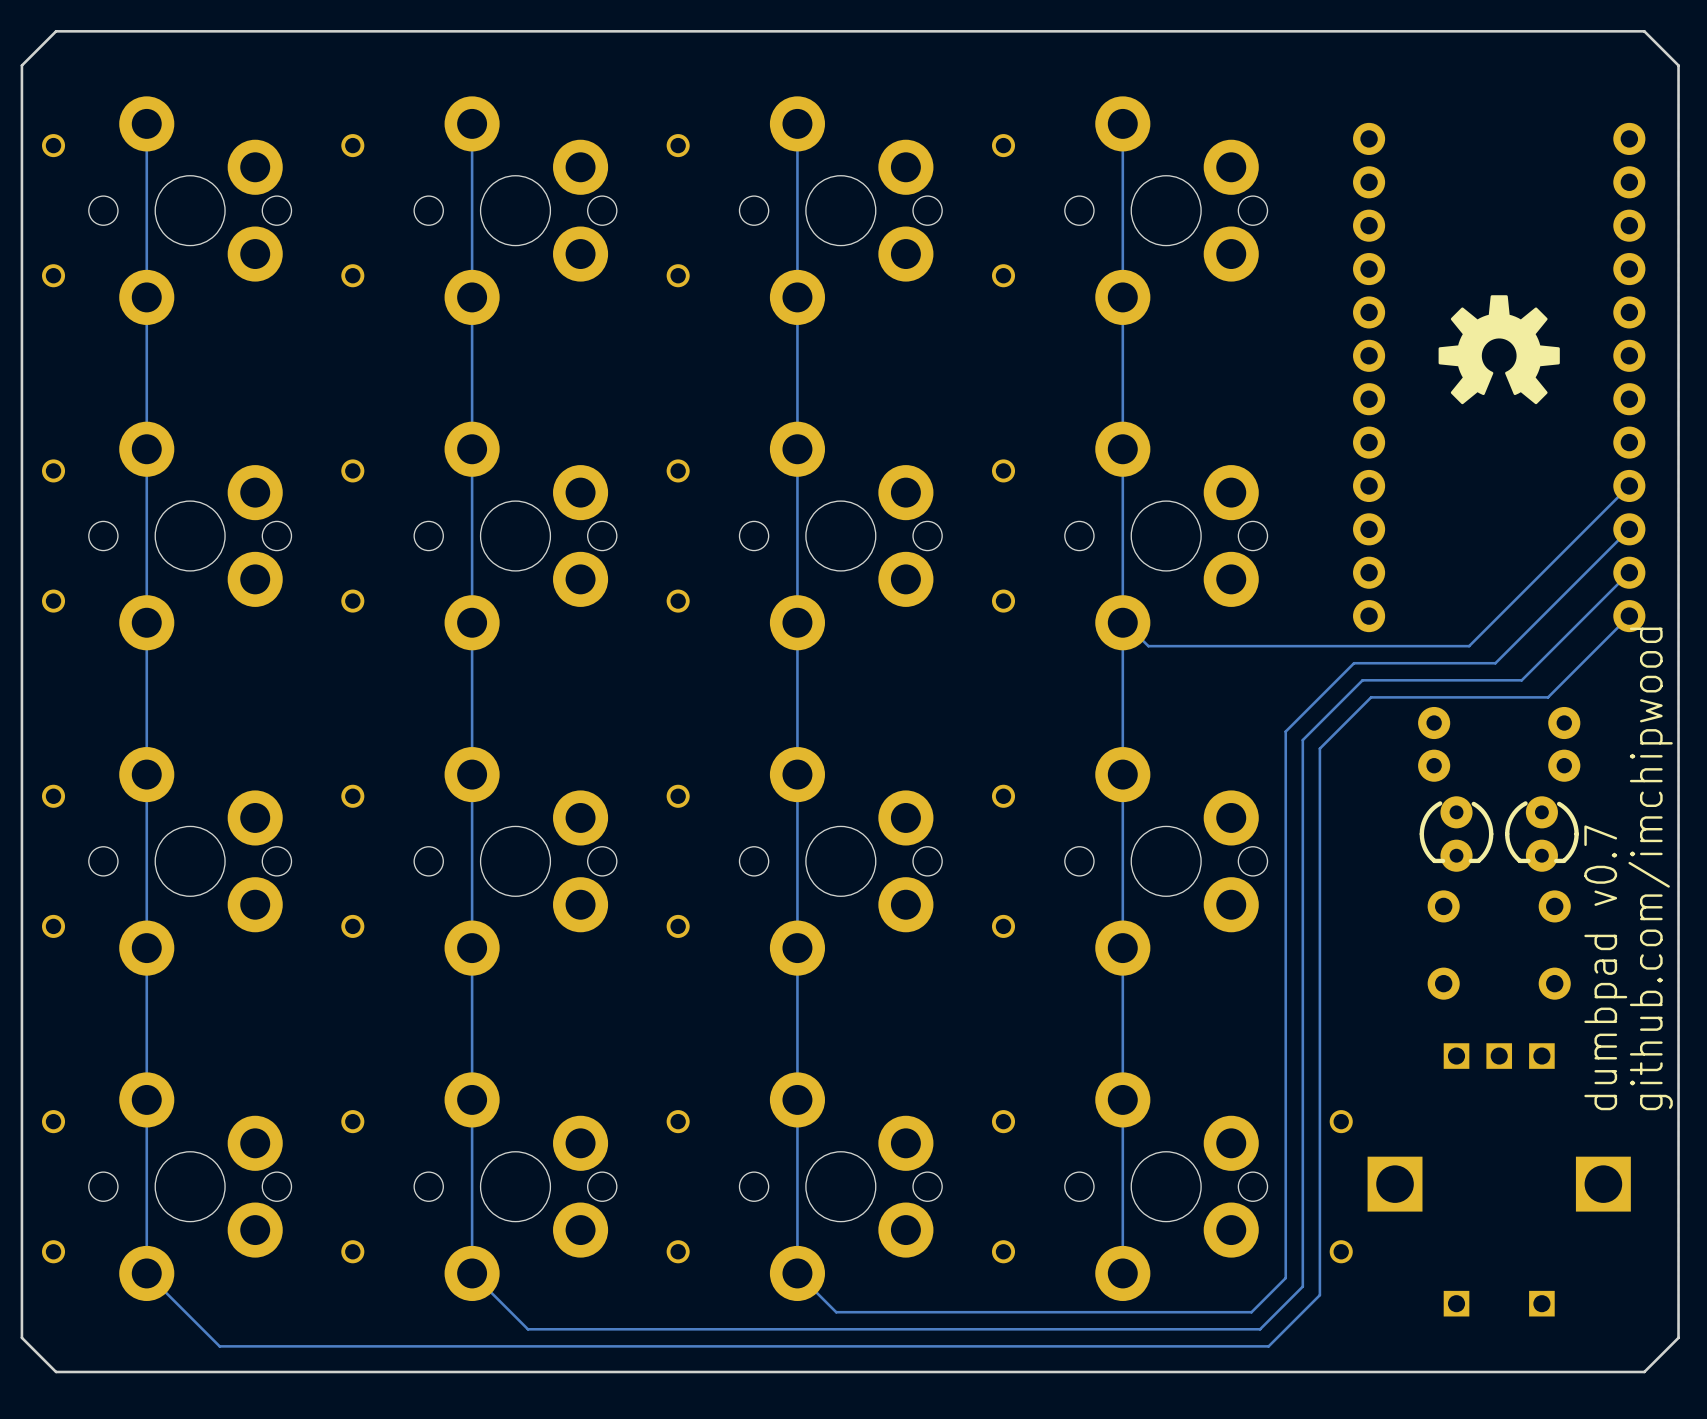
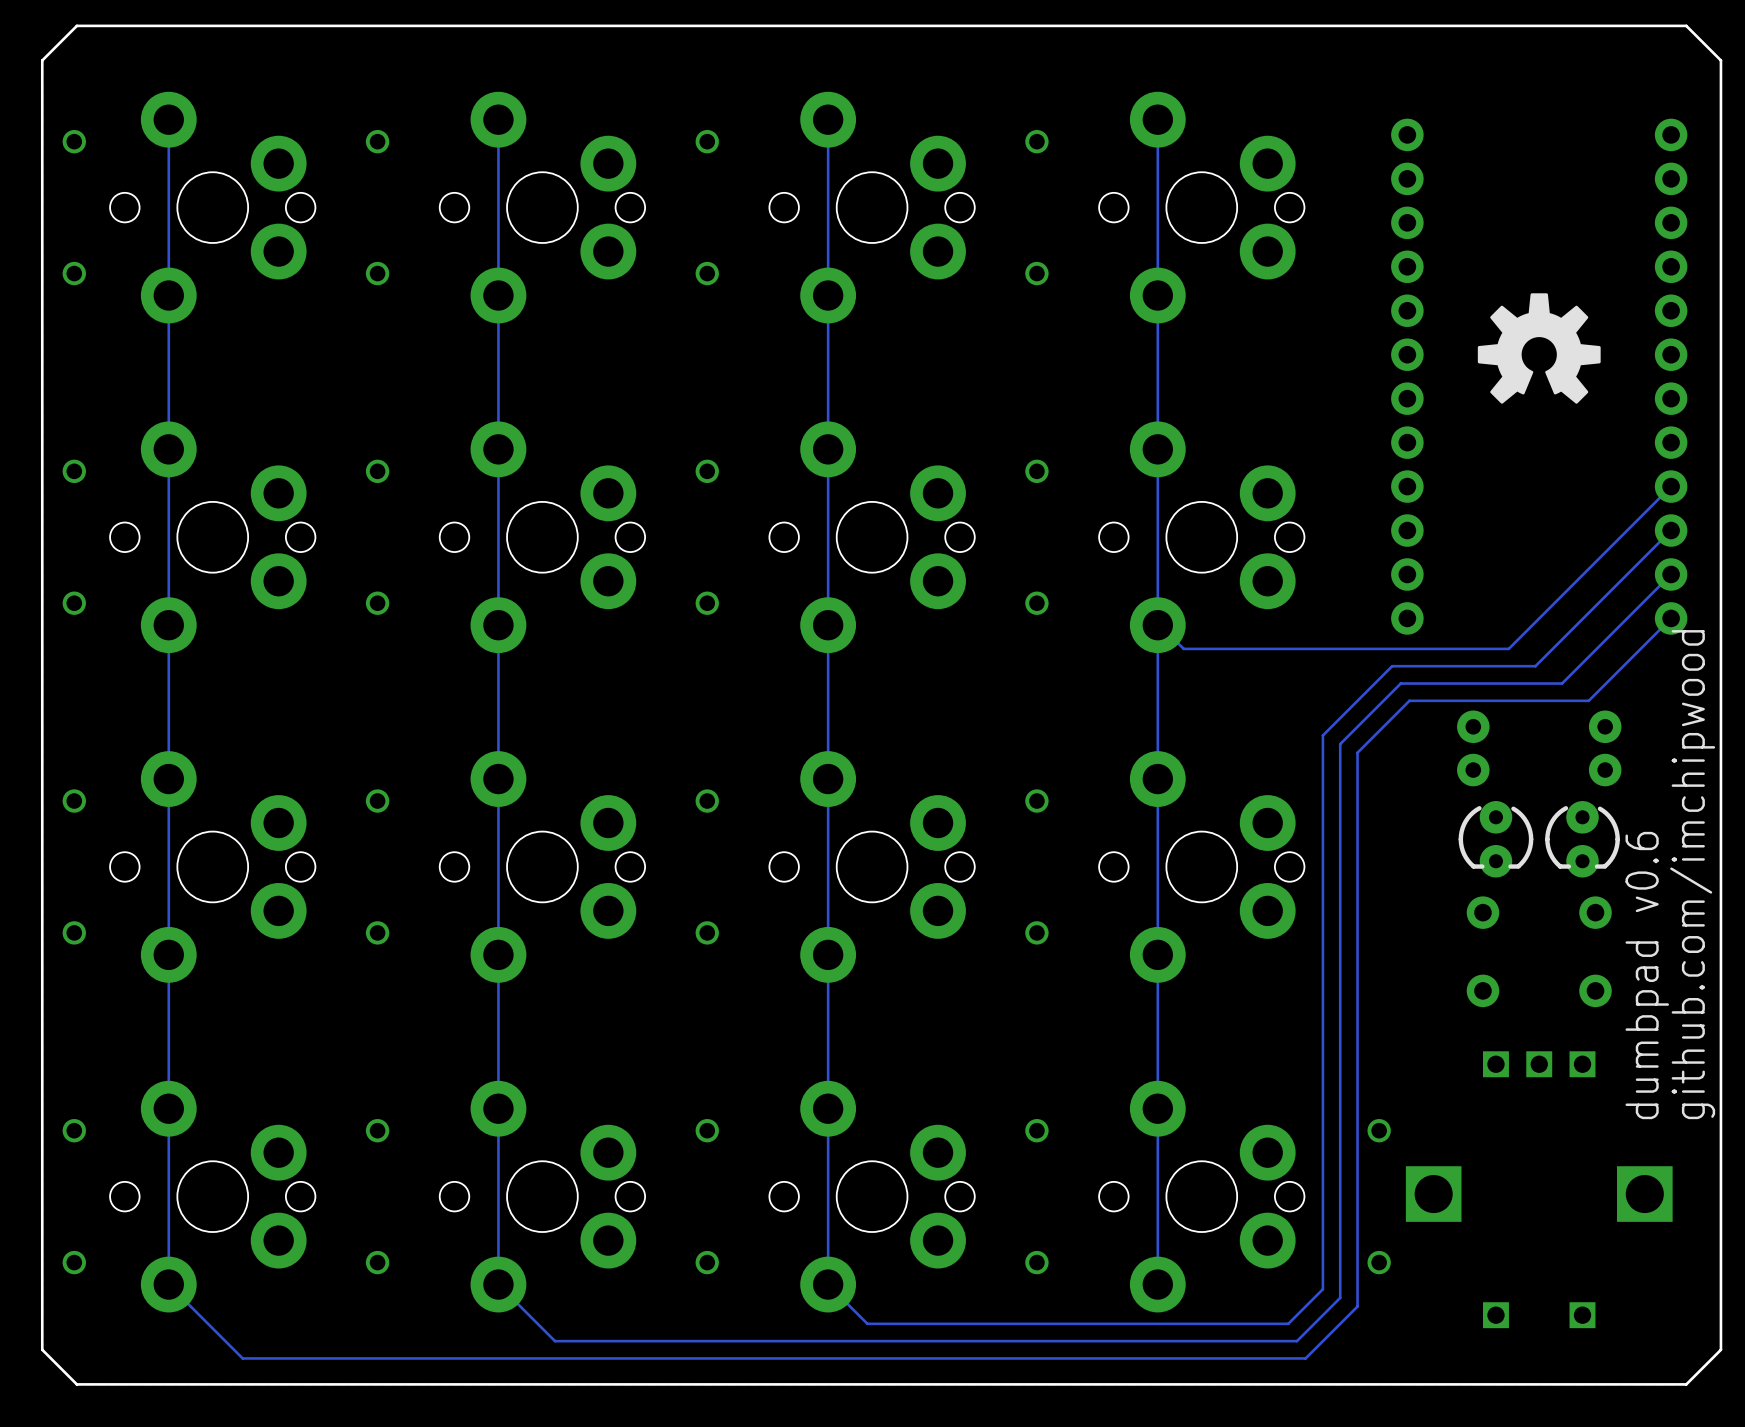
text: dumbpad v0.7 (1605, 967) -> dumbpad v0.6 (1647, 975)

